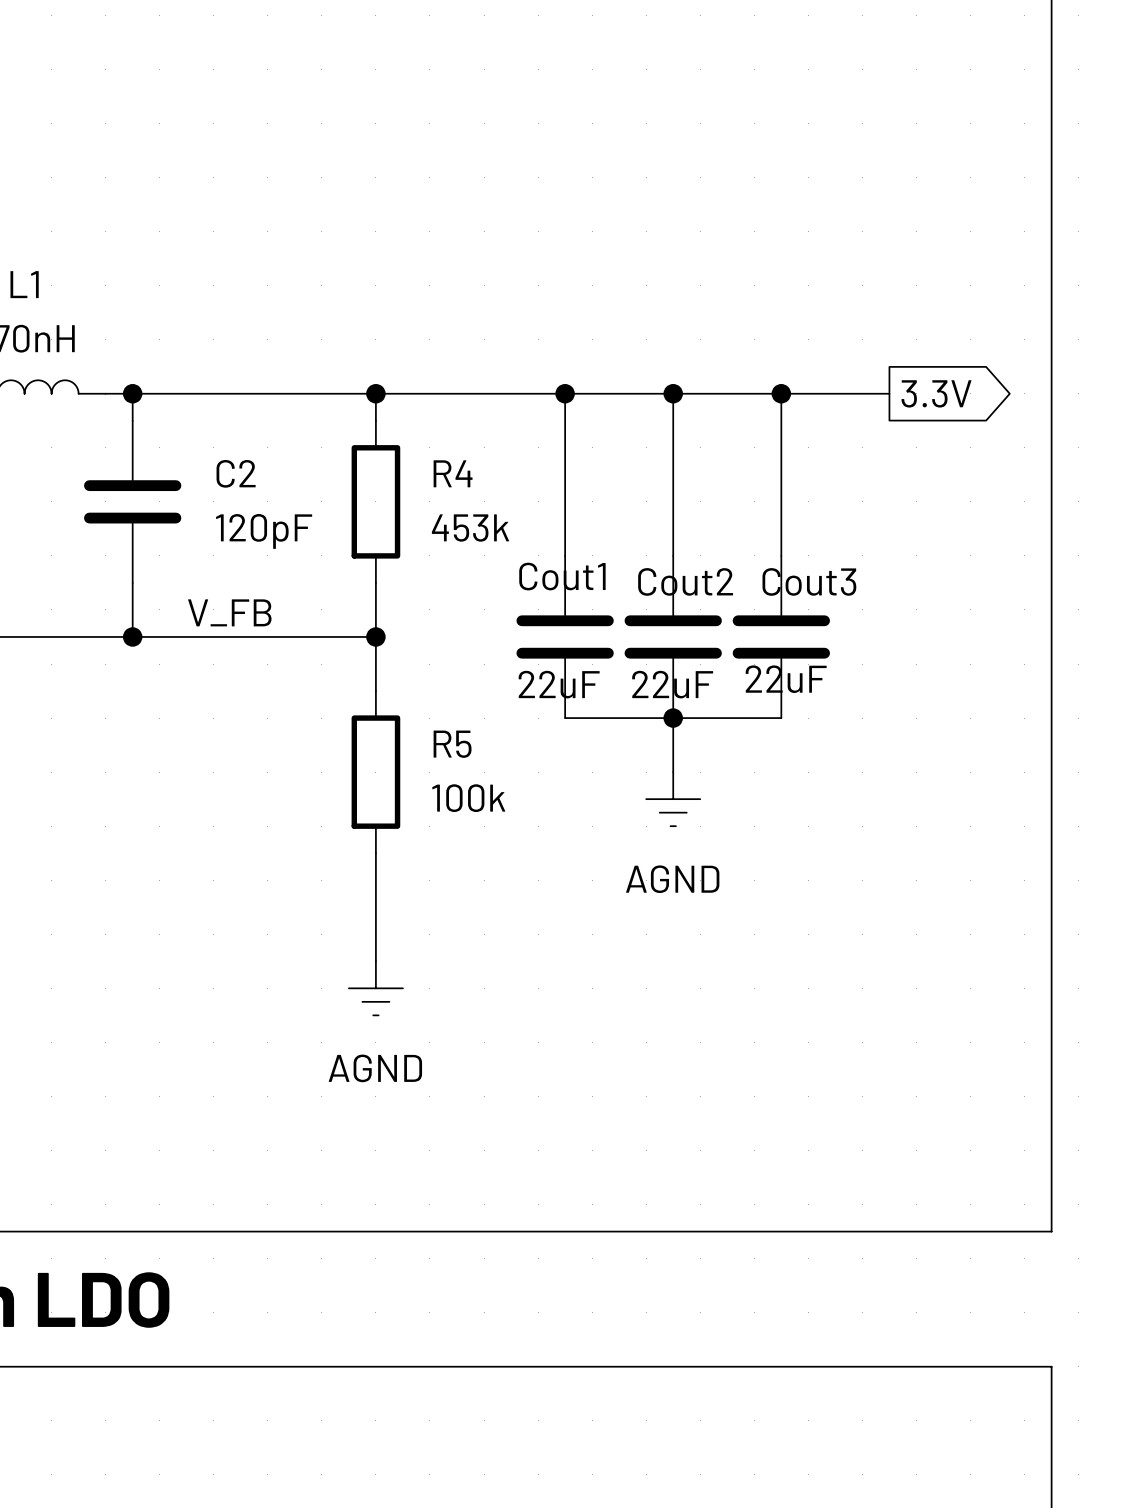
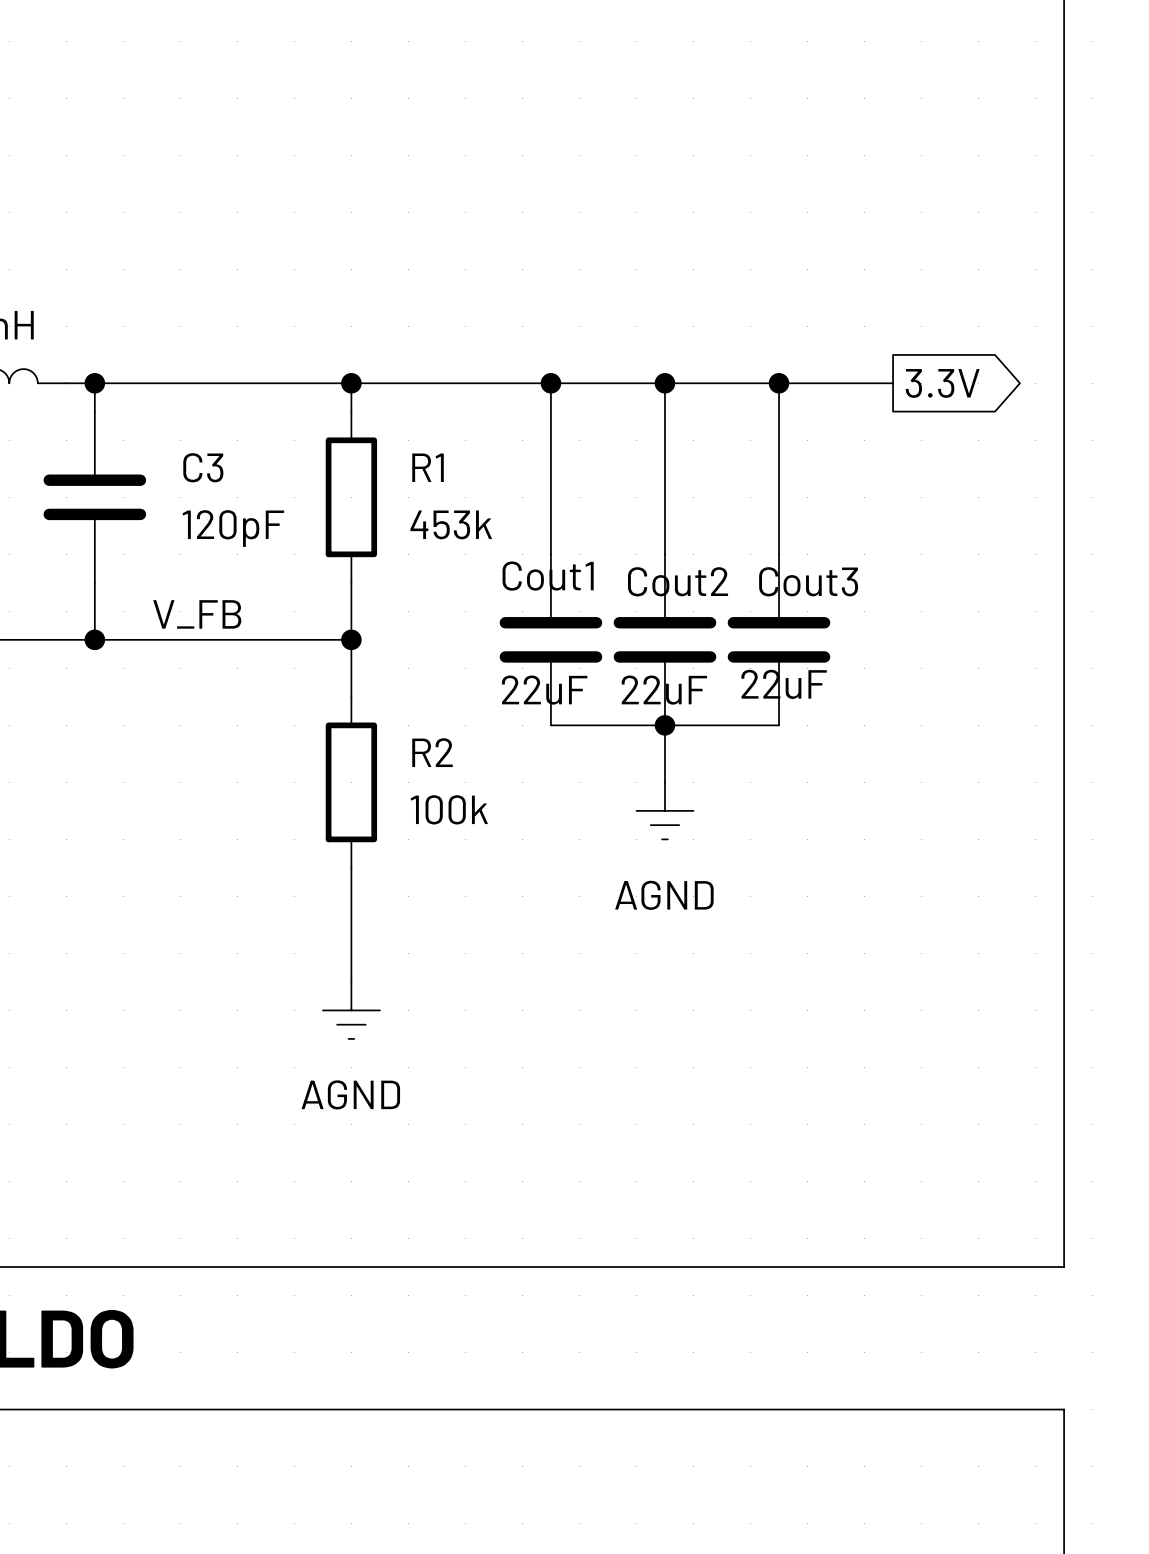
C2 name: C2 (236, 473) -> C3 (203, 467)
R4 name: R4 (453, 473) -> R1 (428, 467)
R5 name: R5 (452, 744) -> R2 (432, 752)

